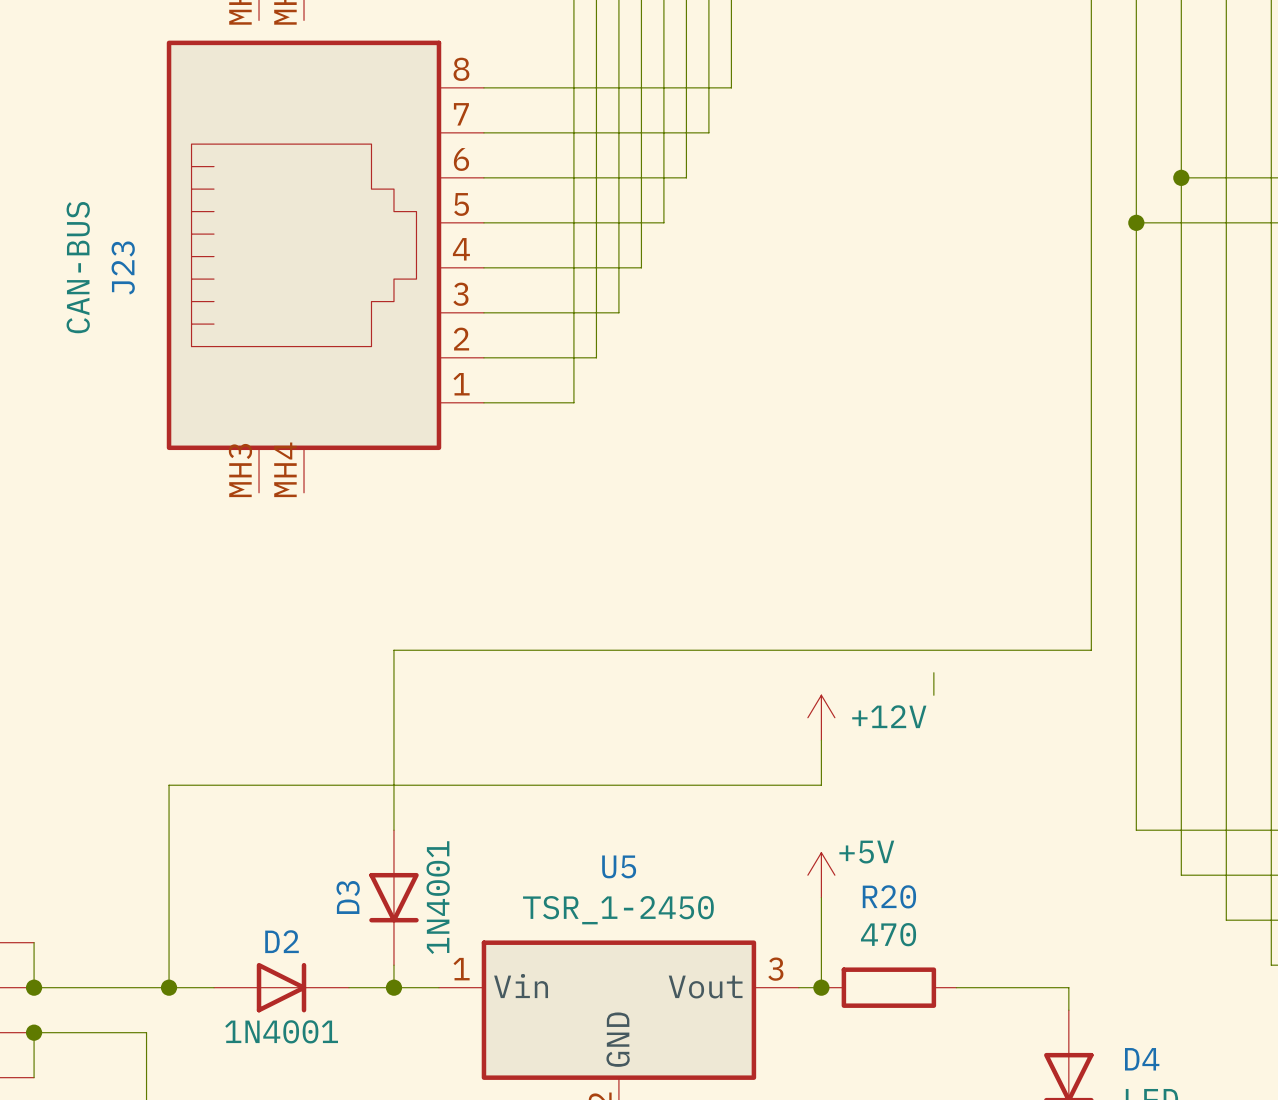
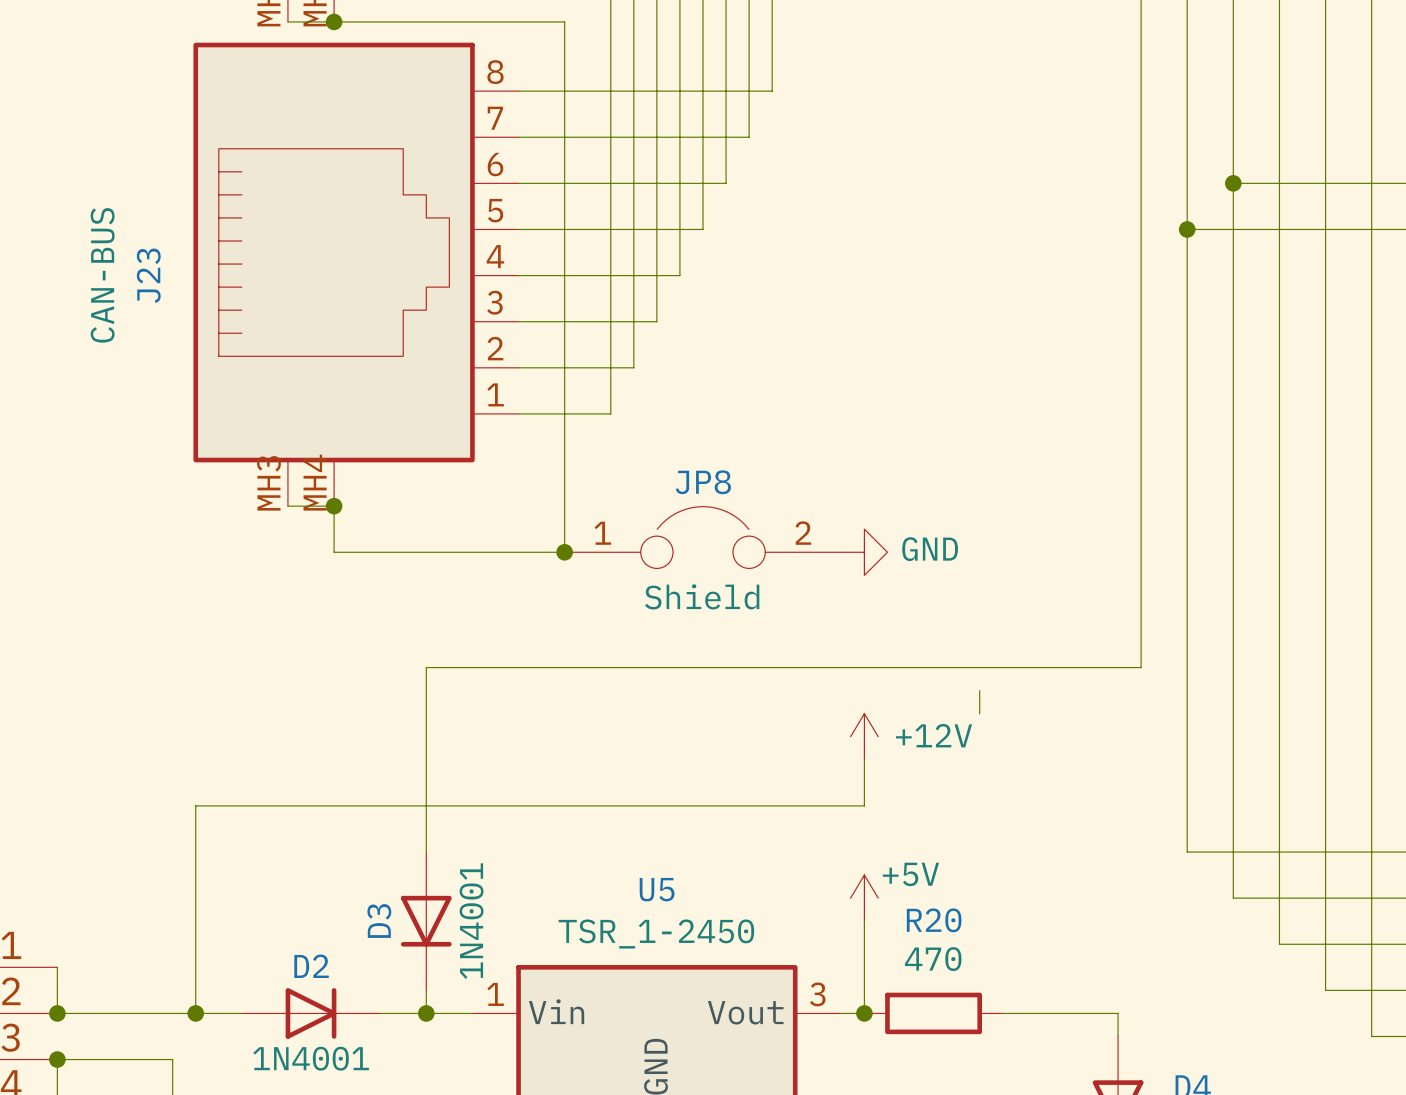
wire: none -> (287, 21) (564, 21) (564, 552) (334, 552) (334, 506) (287, 506)
junction: none -> (334, 21)
junction: none -> (334, 506)
JP8: none -> Shield (703, 537)
junction: none -> (564, 552)
power symbol: none -> GND (864, 552)

